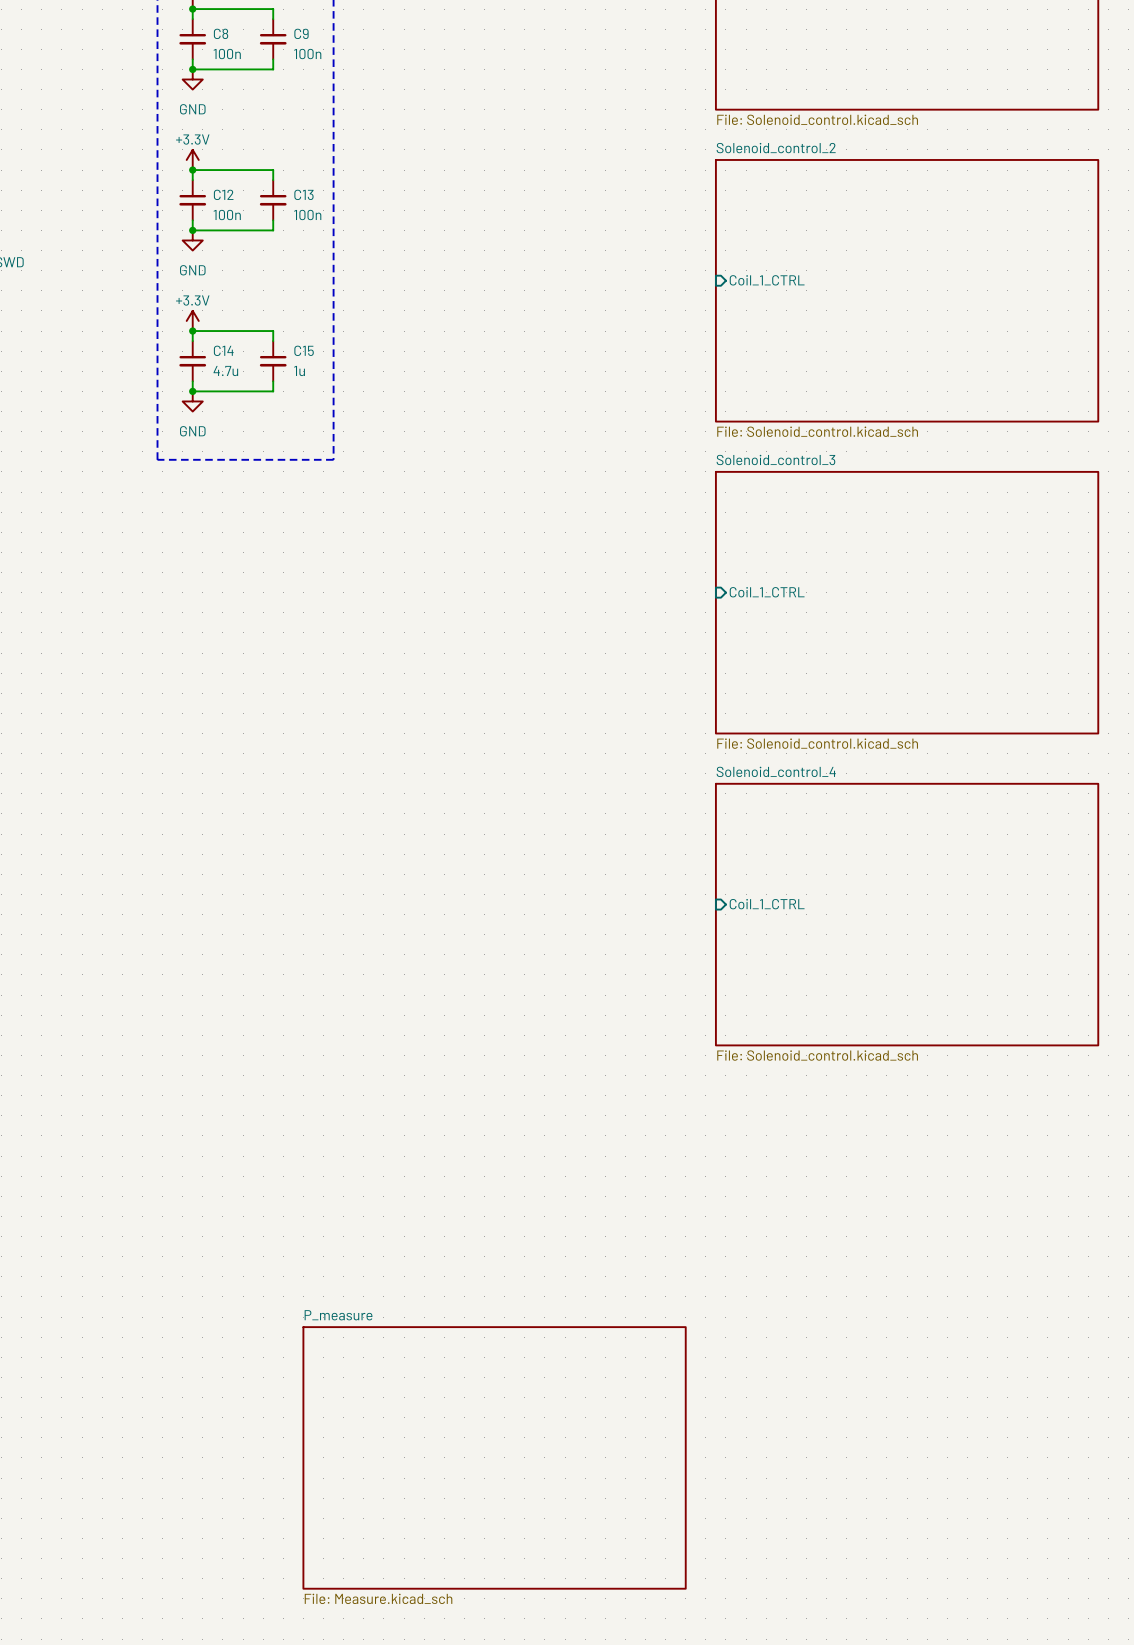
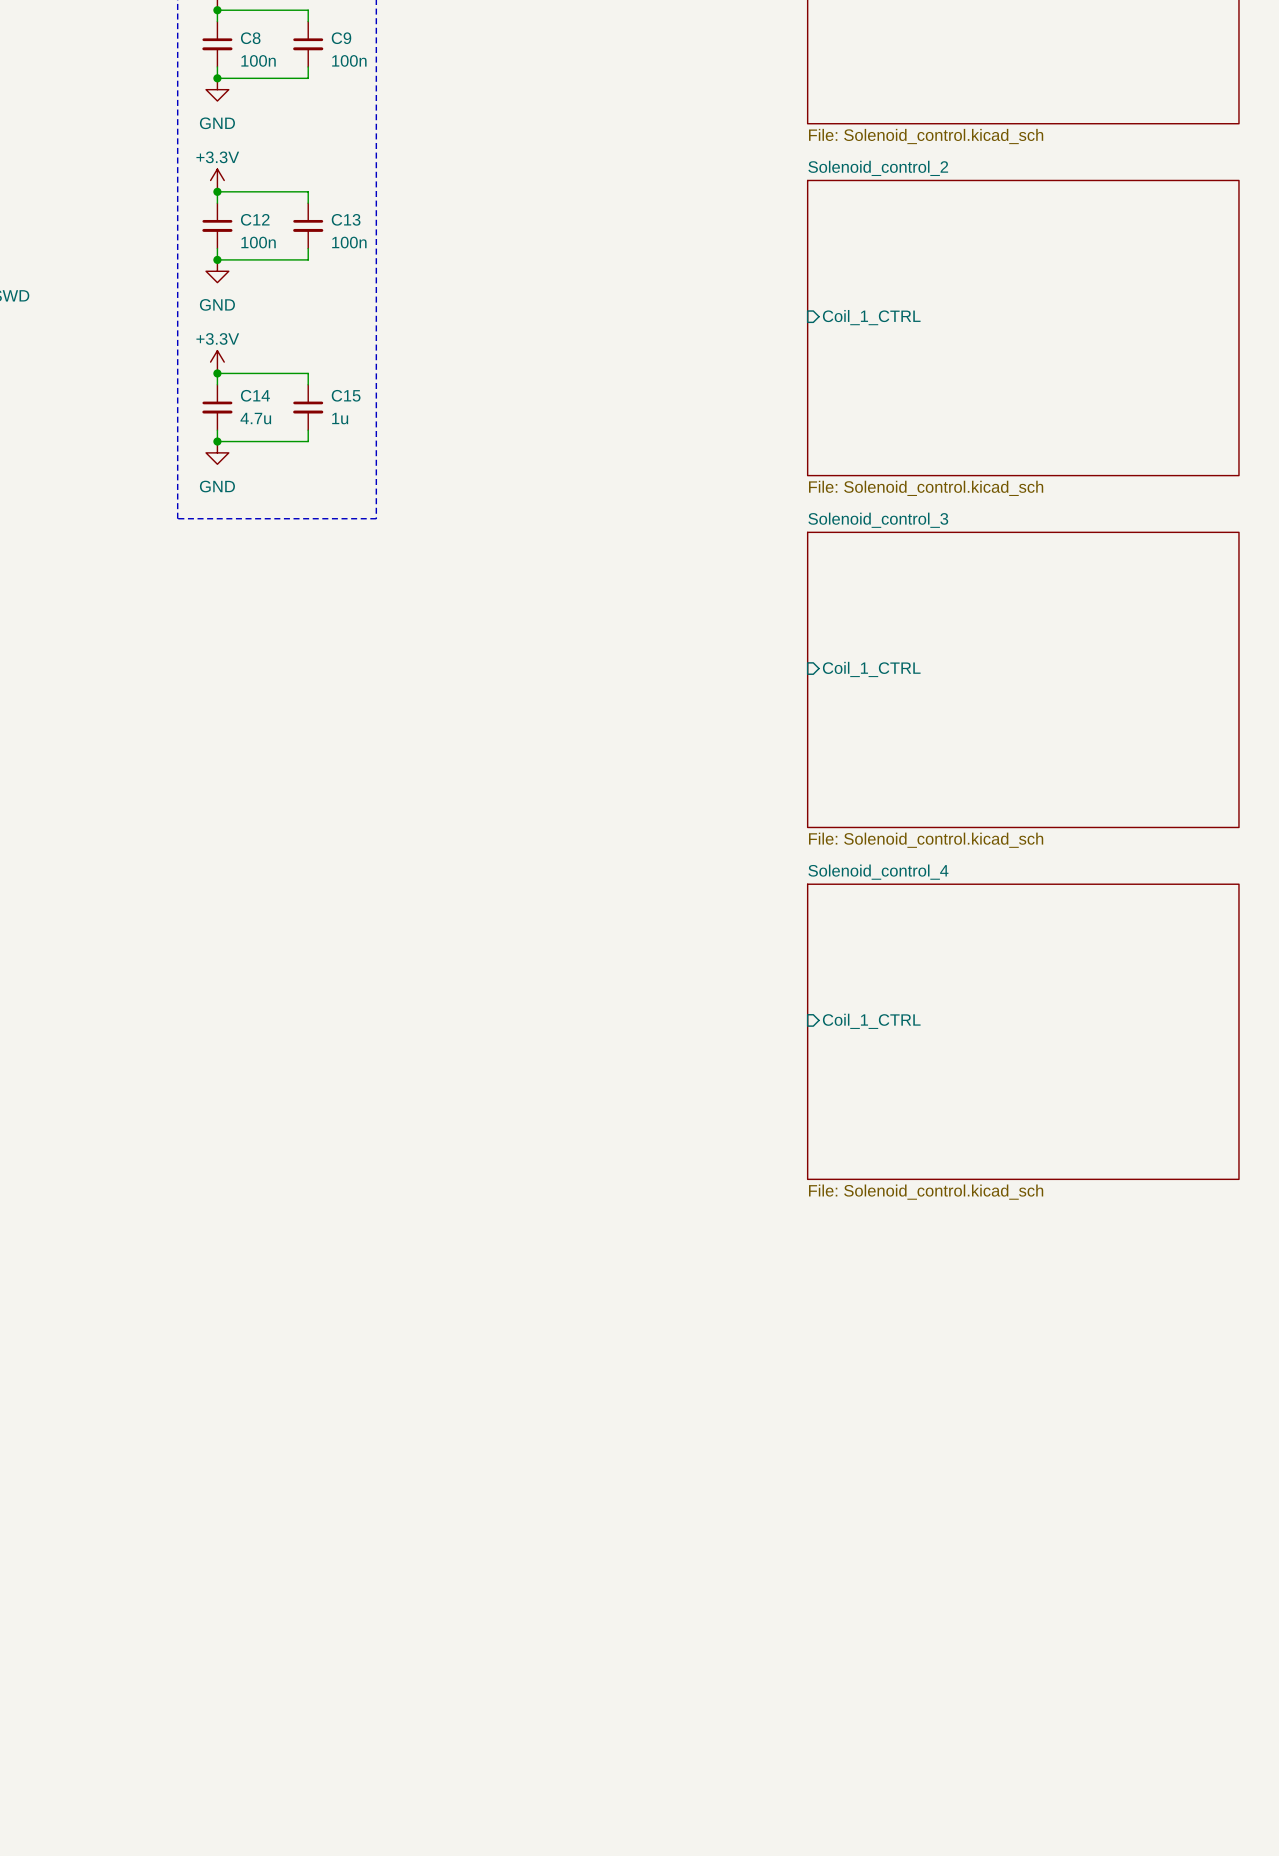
sheet P_measure: File: Measure.kicad_sch (494, 1457) -> none

